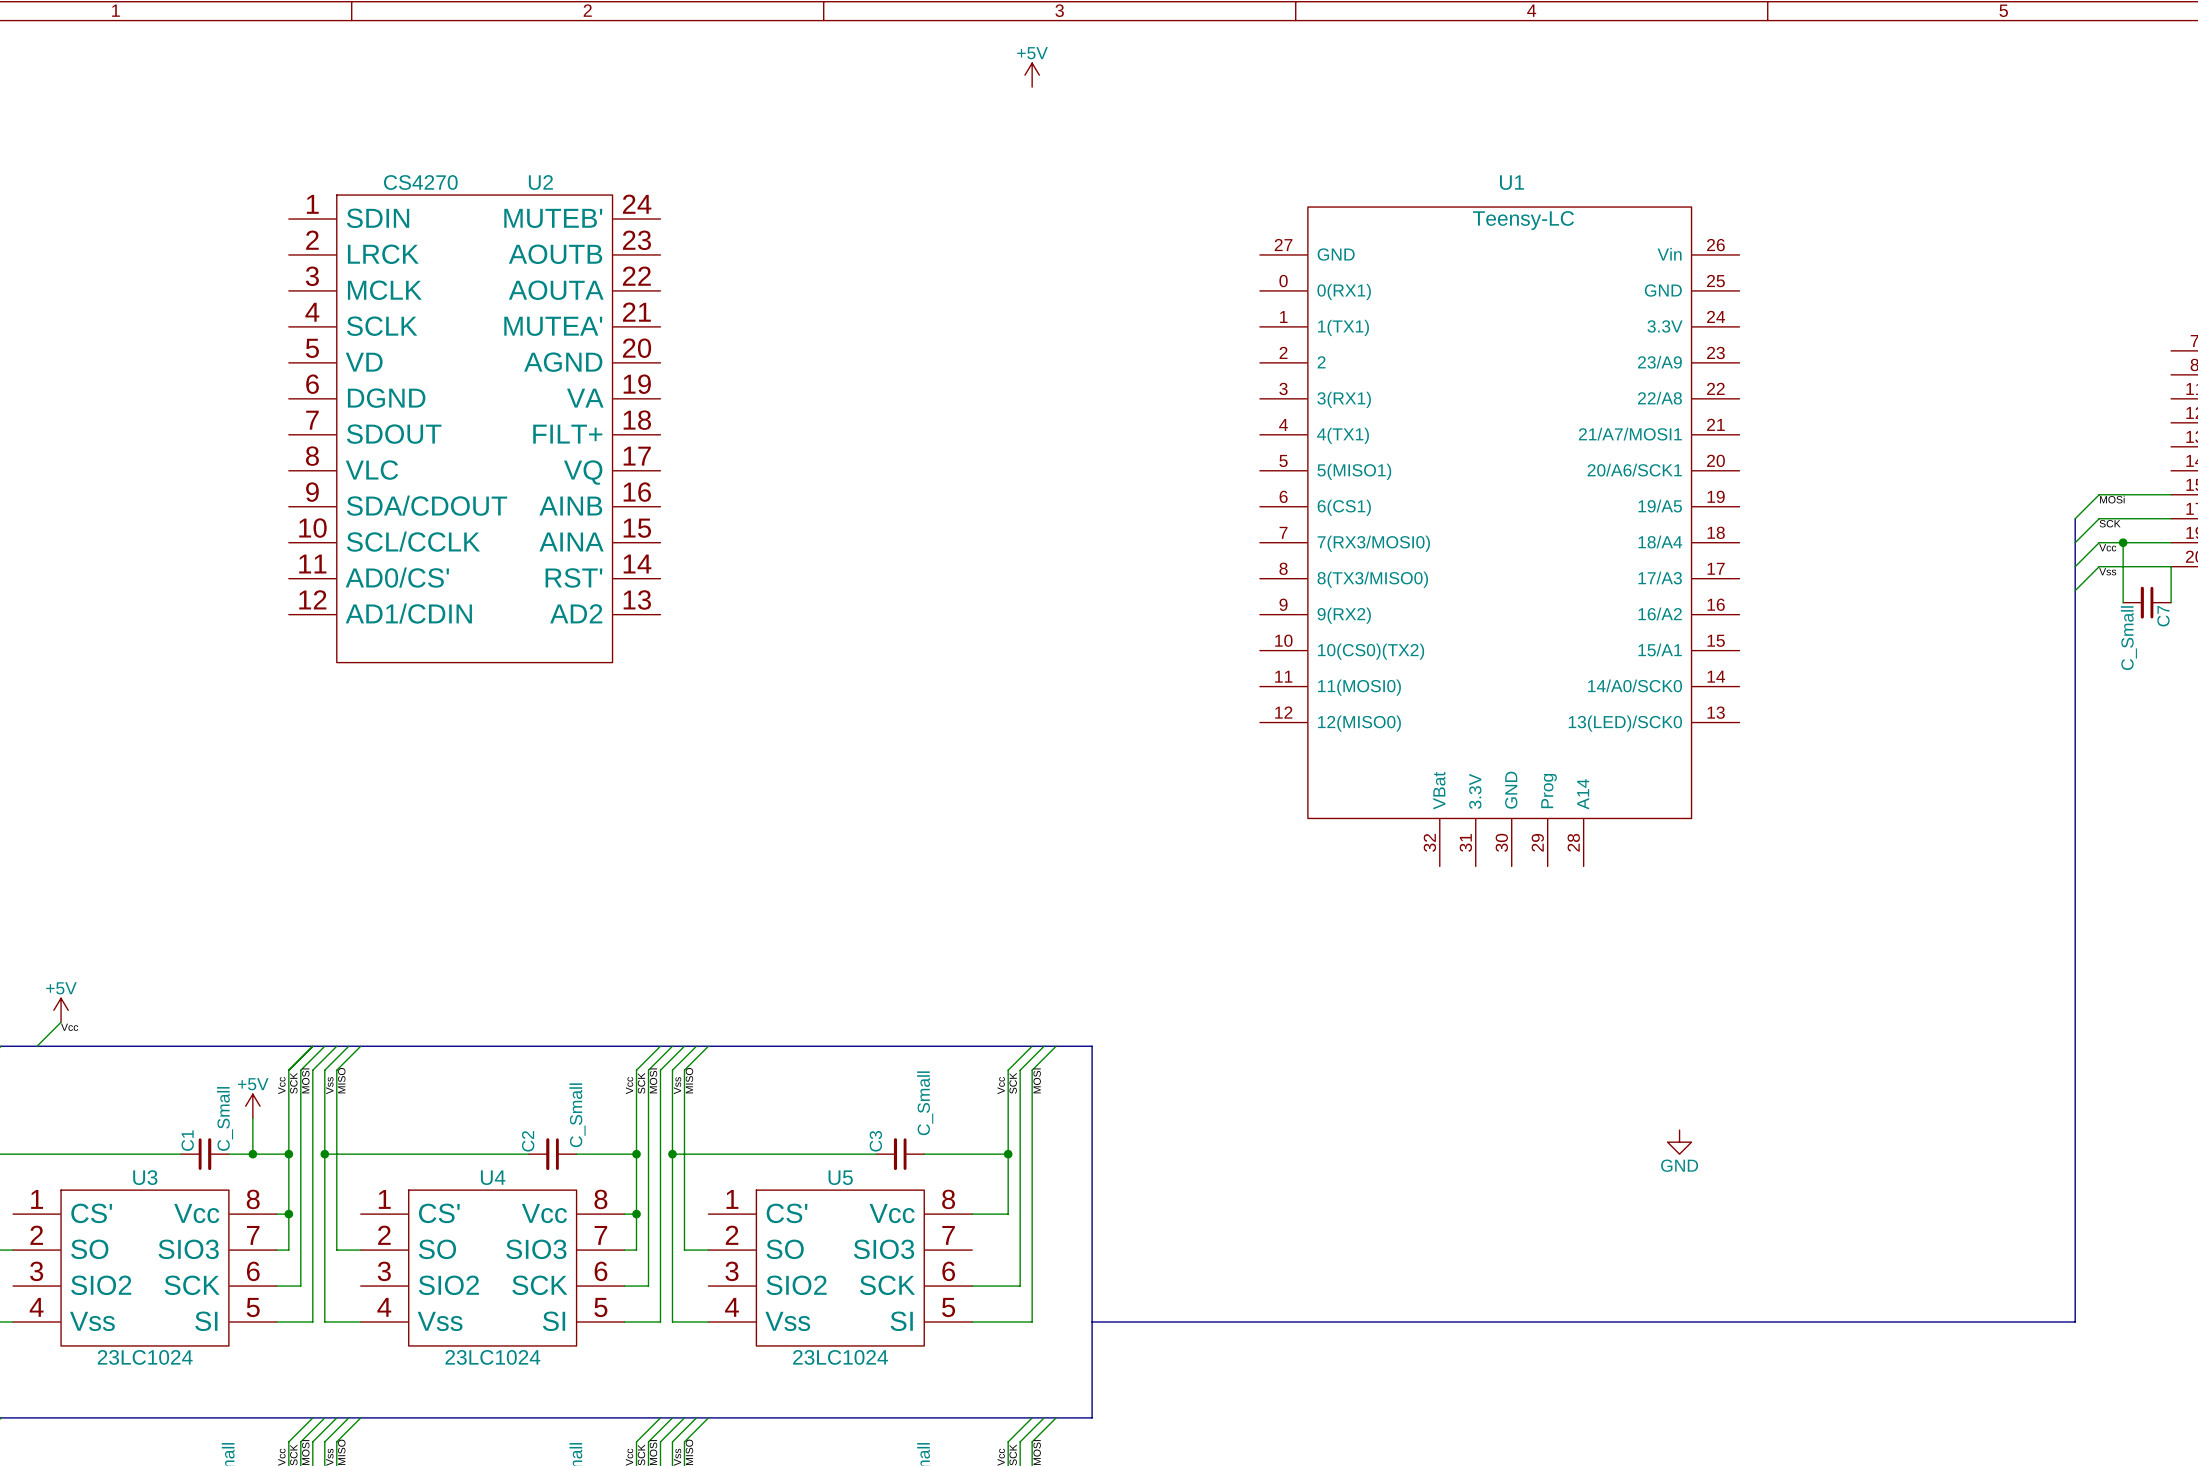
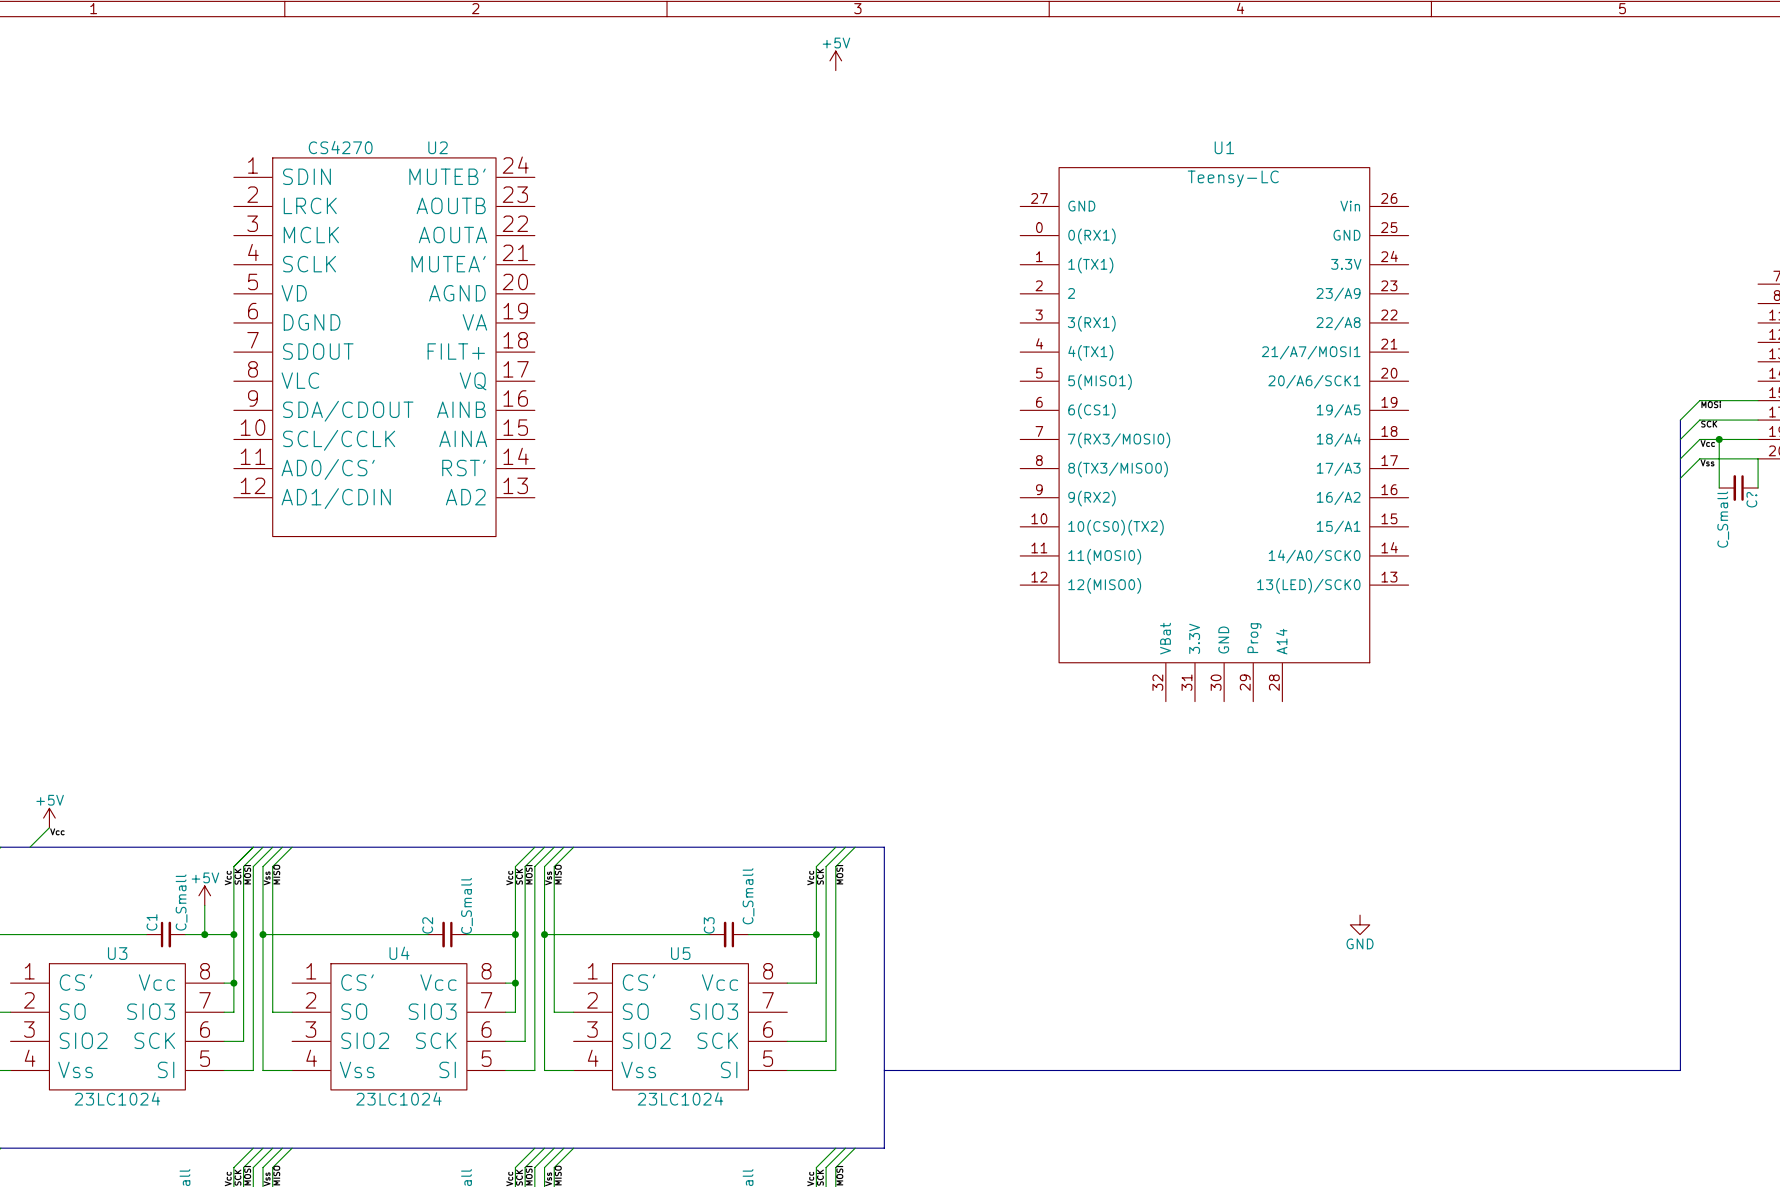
C7 name: C7 (2163, 616) -> C? (1751, 499)

